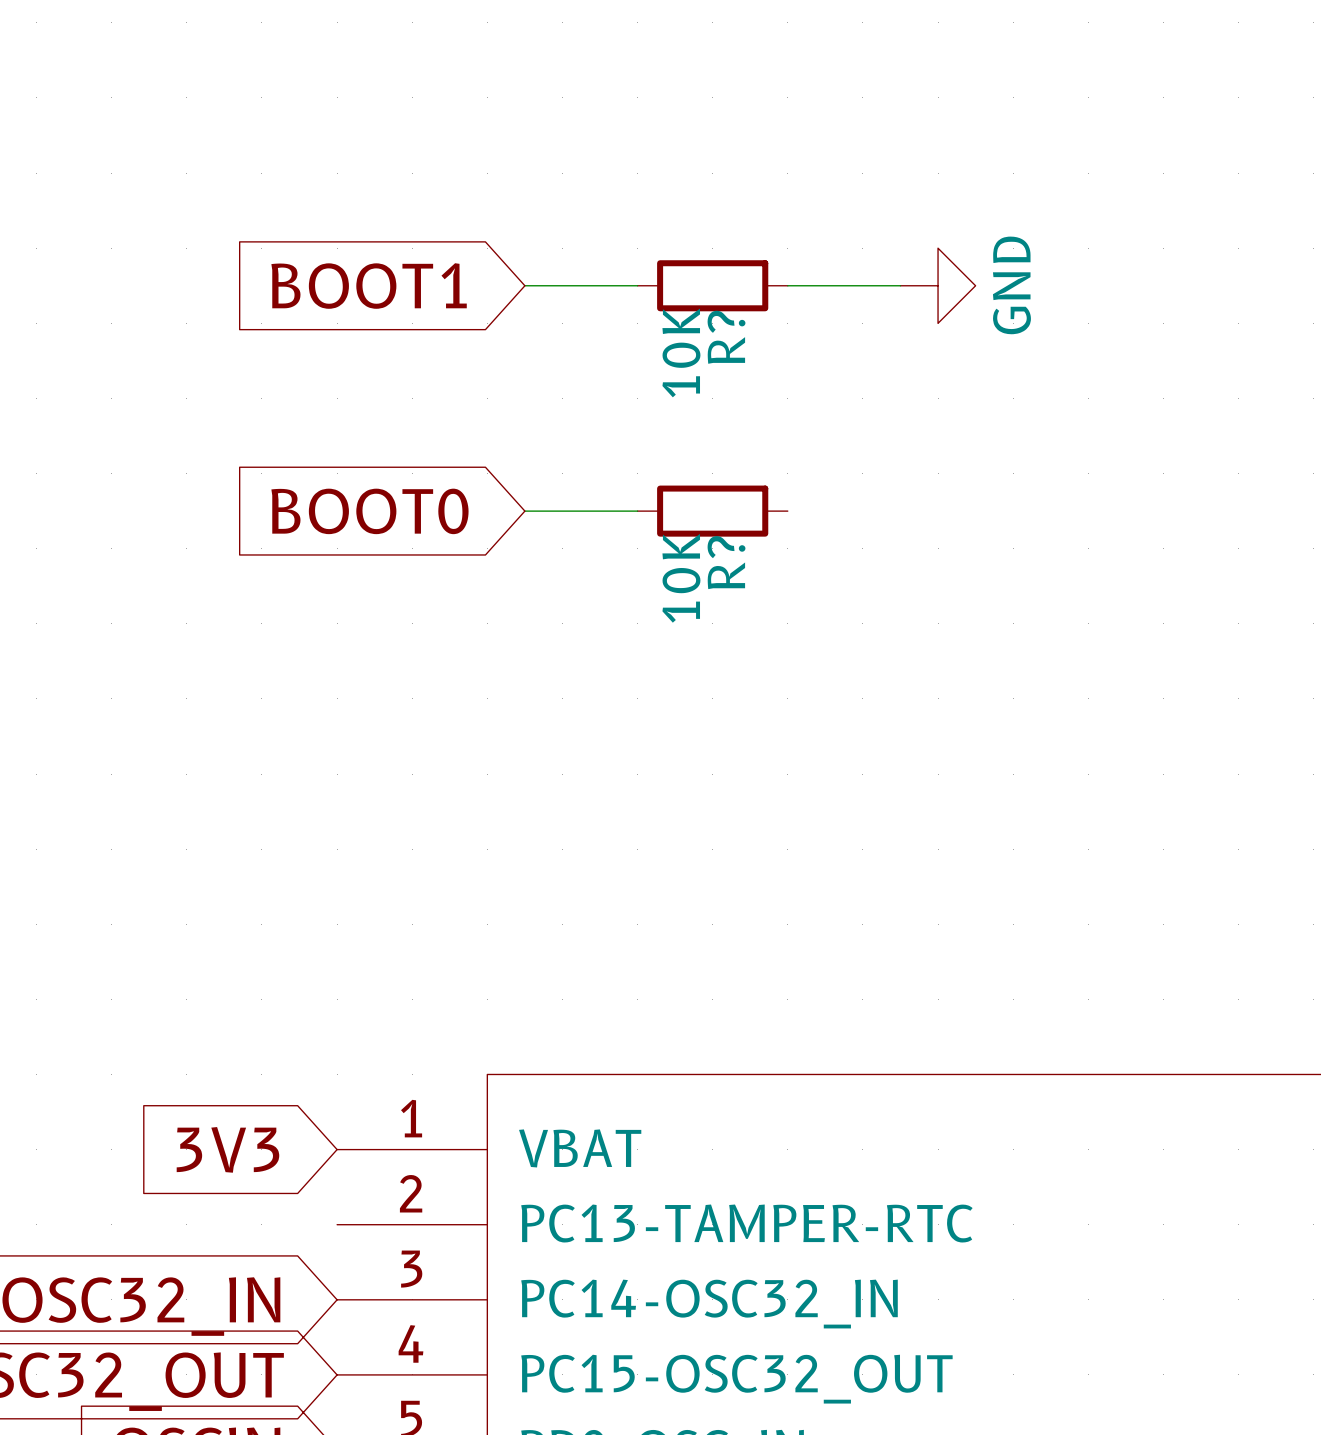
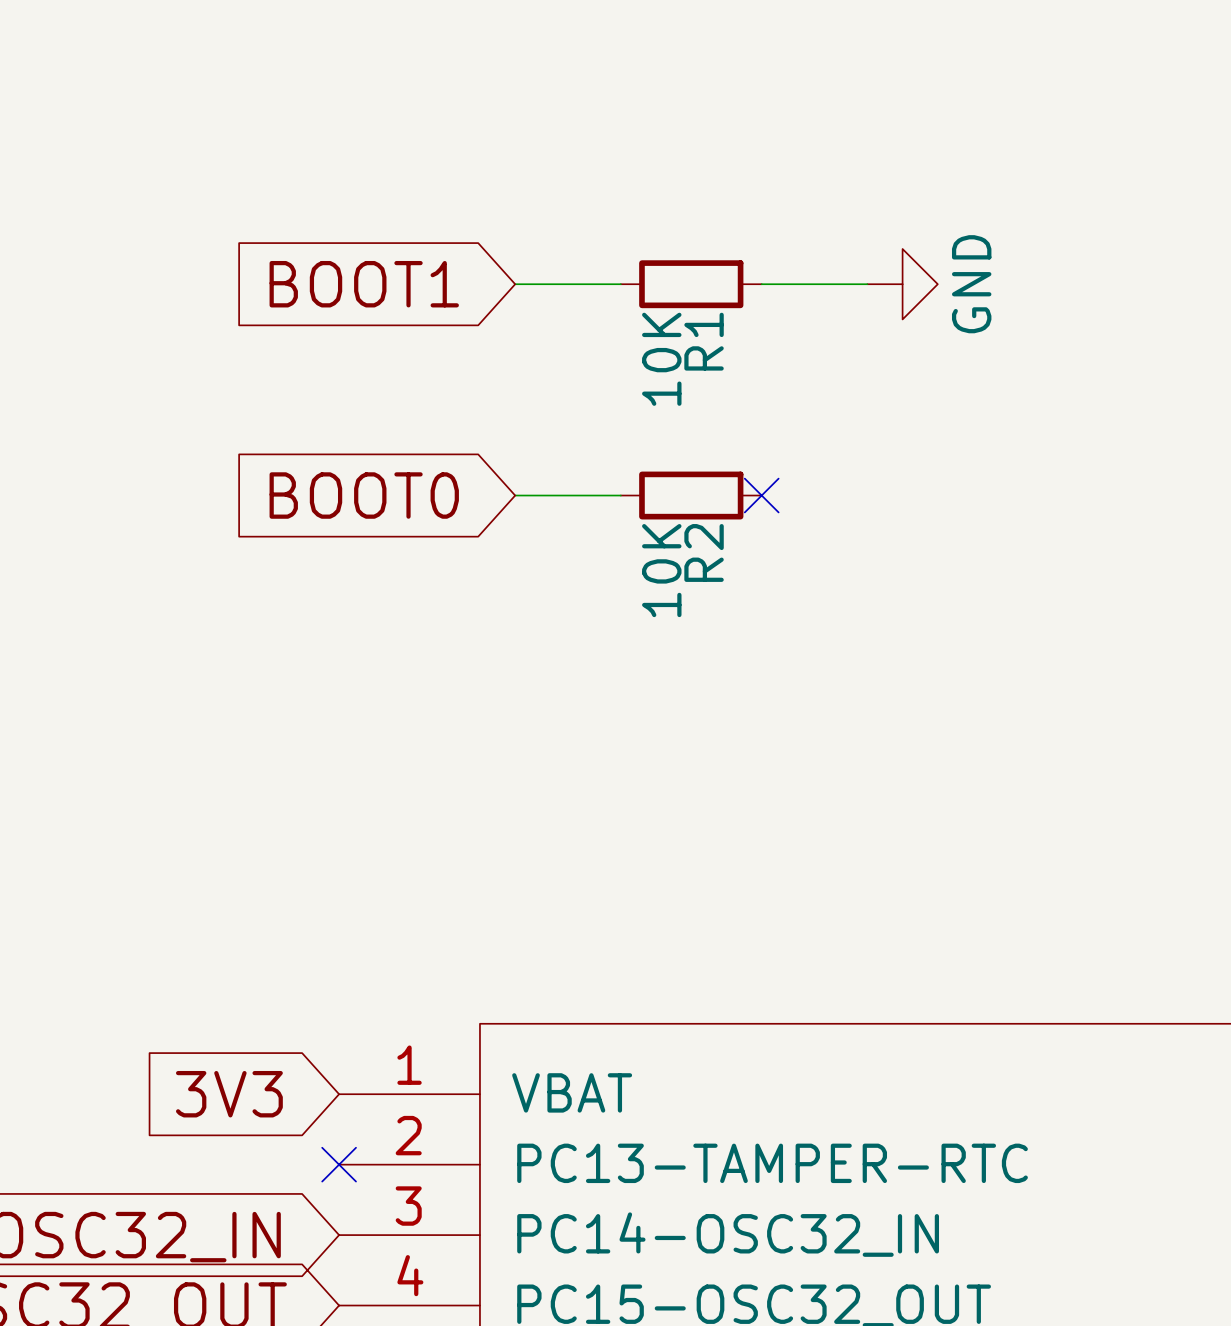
R? name: R? (726, 337) -> R1 (704, 341)
no-connect mark: none -> (761, 495)
R? name: R? (726, 562) -> R2 (704, 552)
no-connect mark: none -> (339, 1164)

